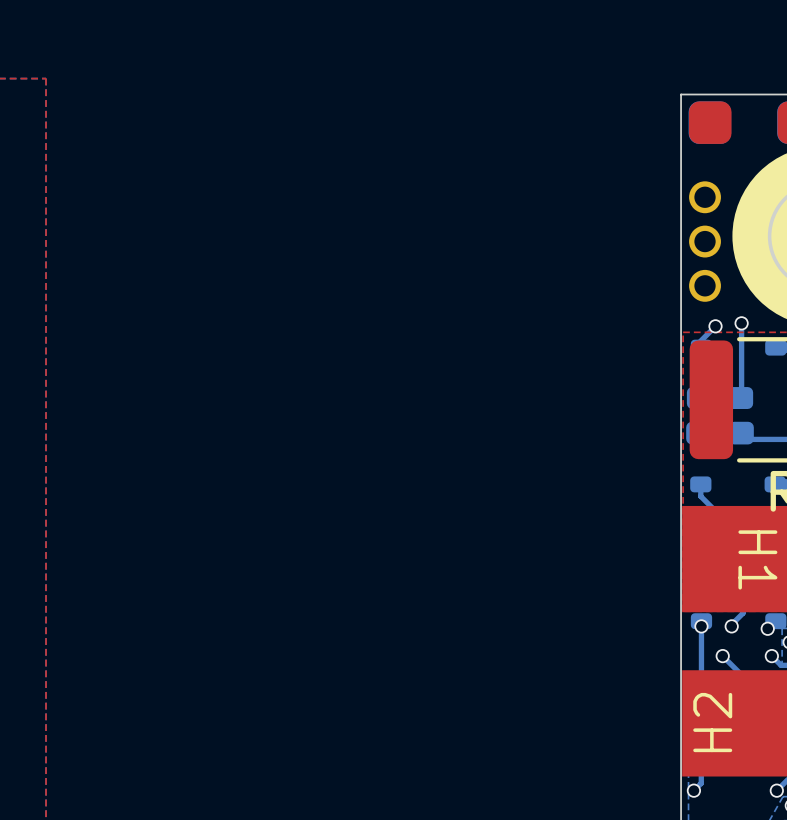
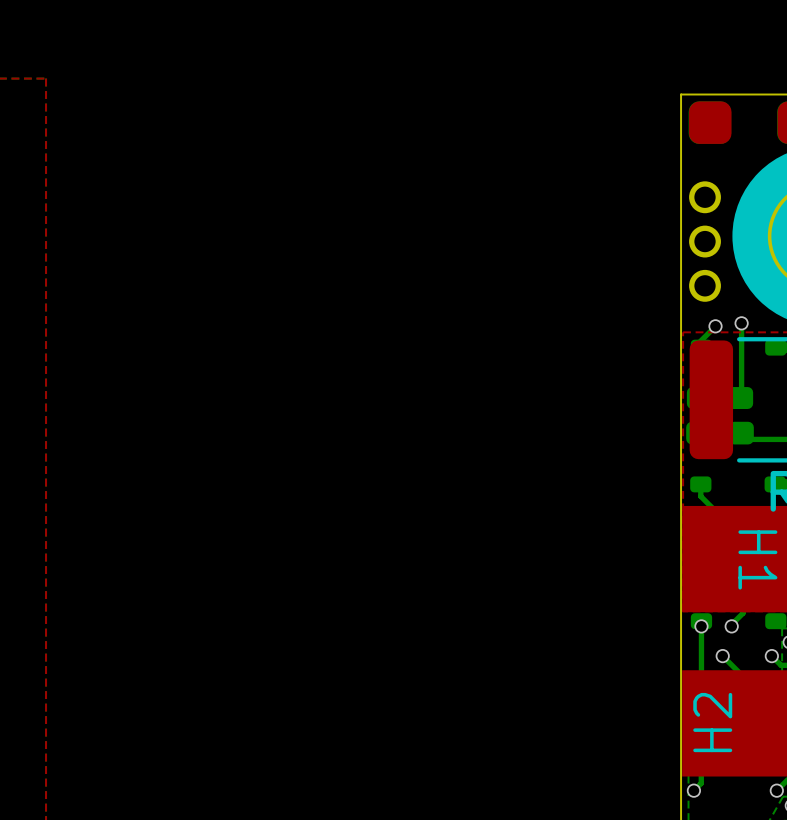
via: (767, 628) -> none

